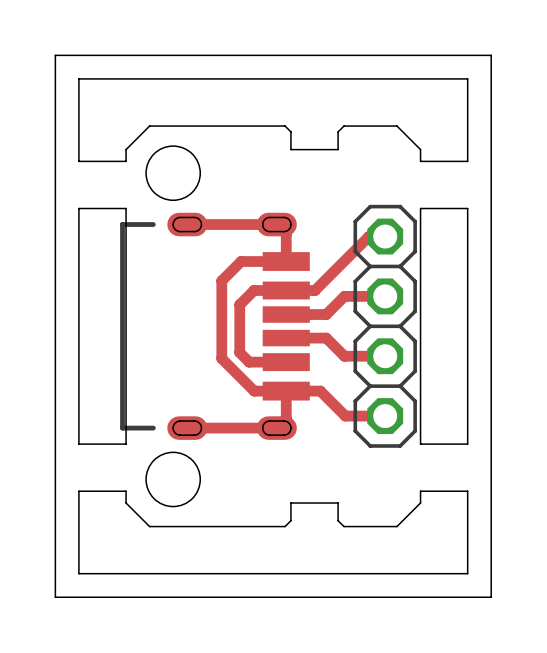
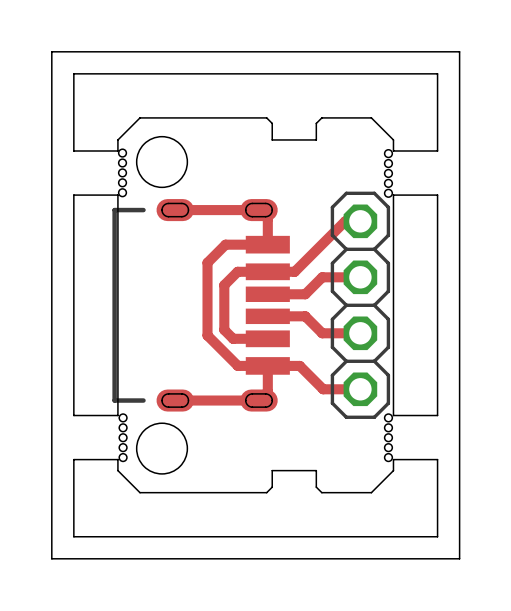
hole: none -> (122, 153)
hole: none -> (388, 153)
hole: none -> (122, 162)
hole: none -> (388, 163)
hole: none -> (122, 172)
hole: none -> (388, 173)
hole: none -> (122, 182)
hole: none -> (388, 183)
hole: none -> (122, 192)
hole: none -> (388, 193)
hole: none -> (123, 417)
hole: none -> (388, 417)
hole: none -> (123, 427)
hole: none -> (388, 427)
hole: none -> (123, 437)
hole: none -> (388, 437)
hole: none -> (123, 447)
hole: none -> (388, 447)
hole: none -> (123, 457)
hole: none -> (388, 457)

